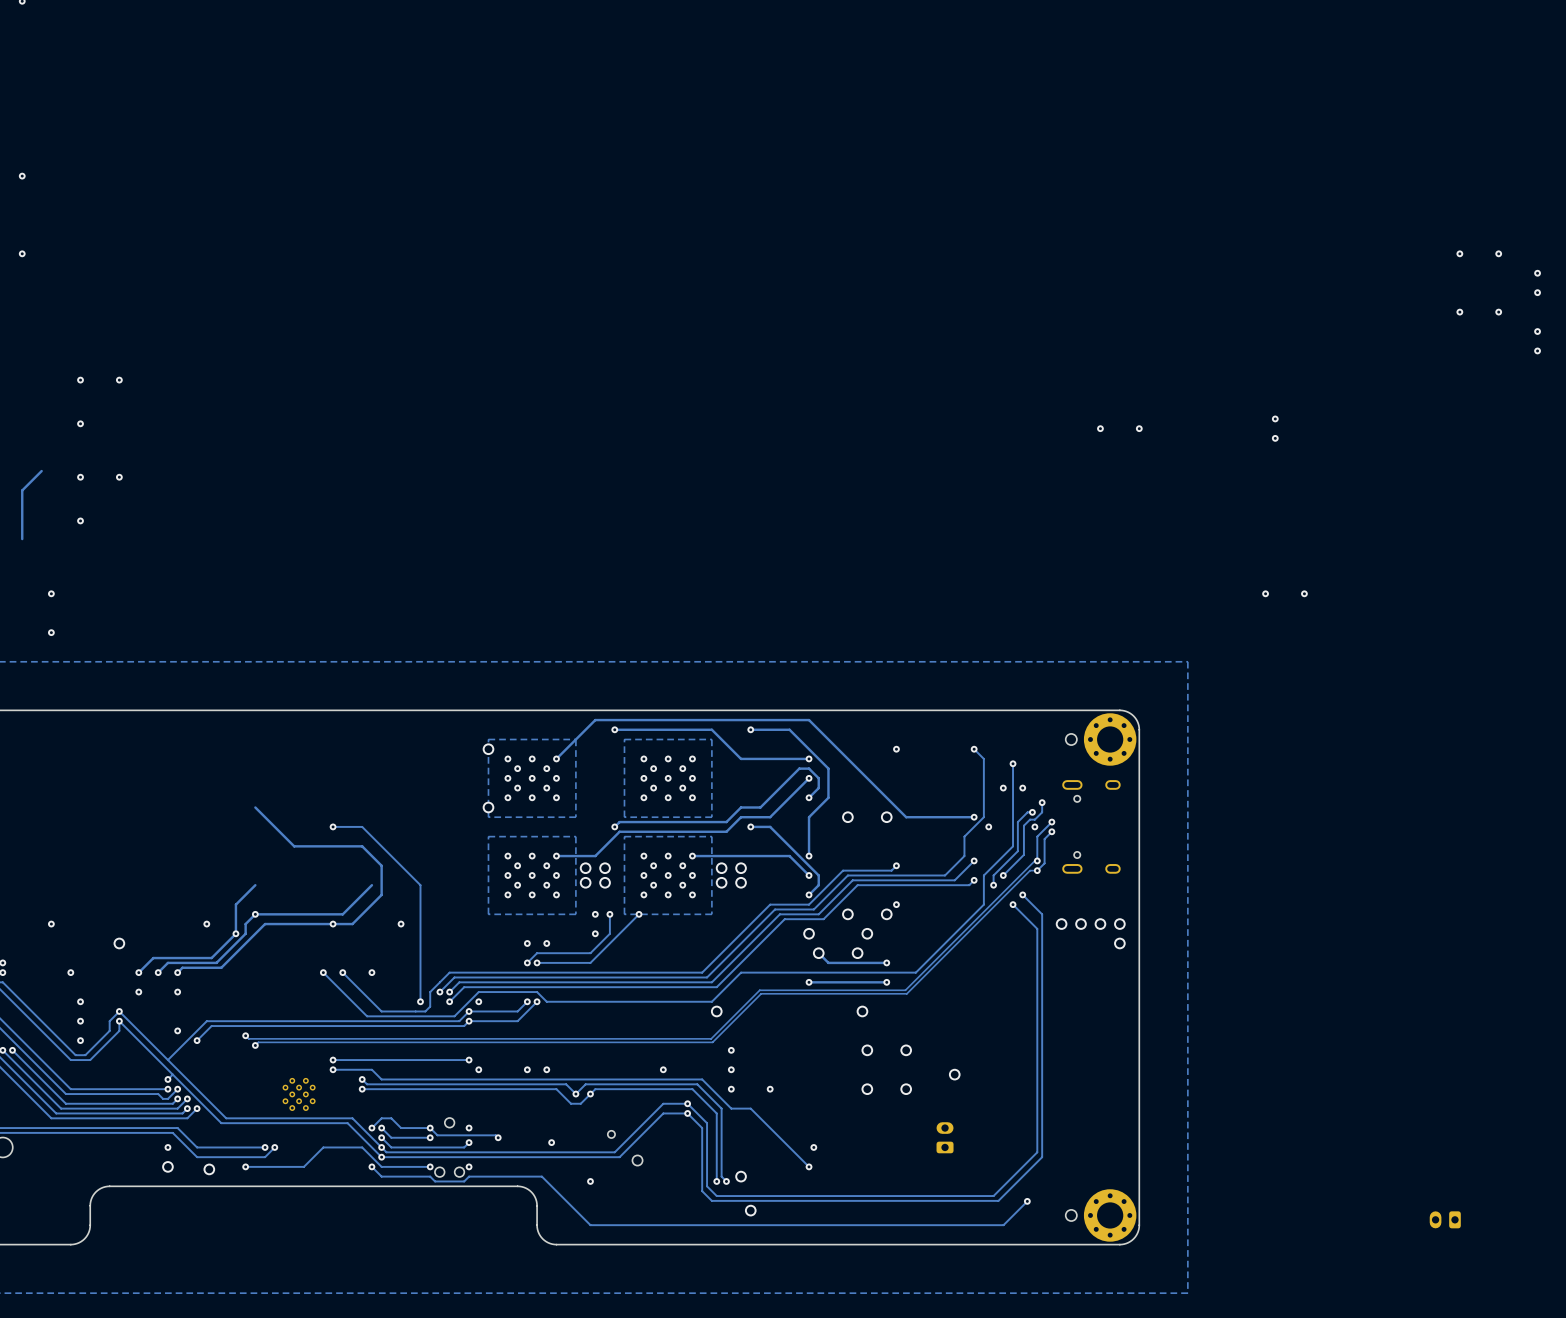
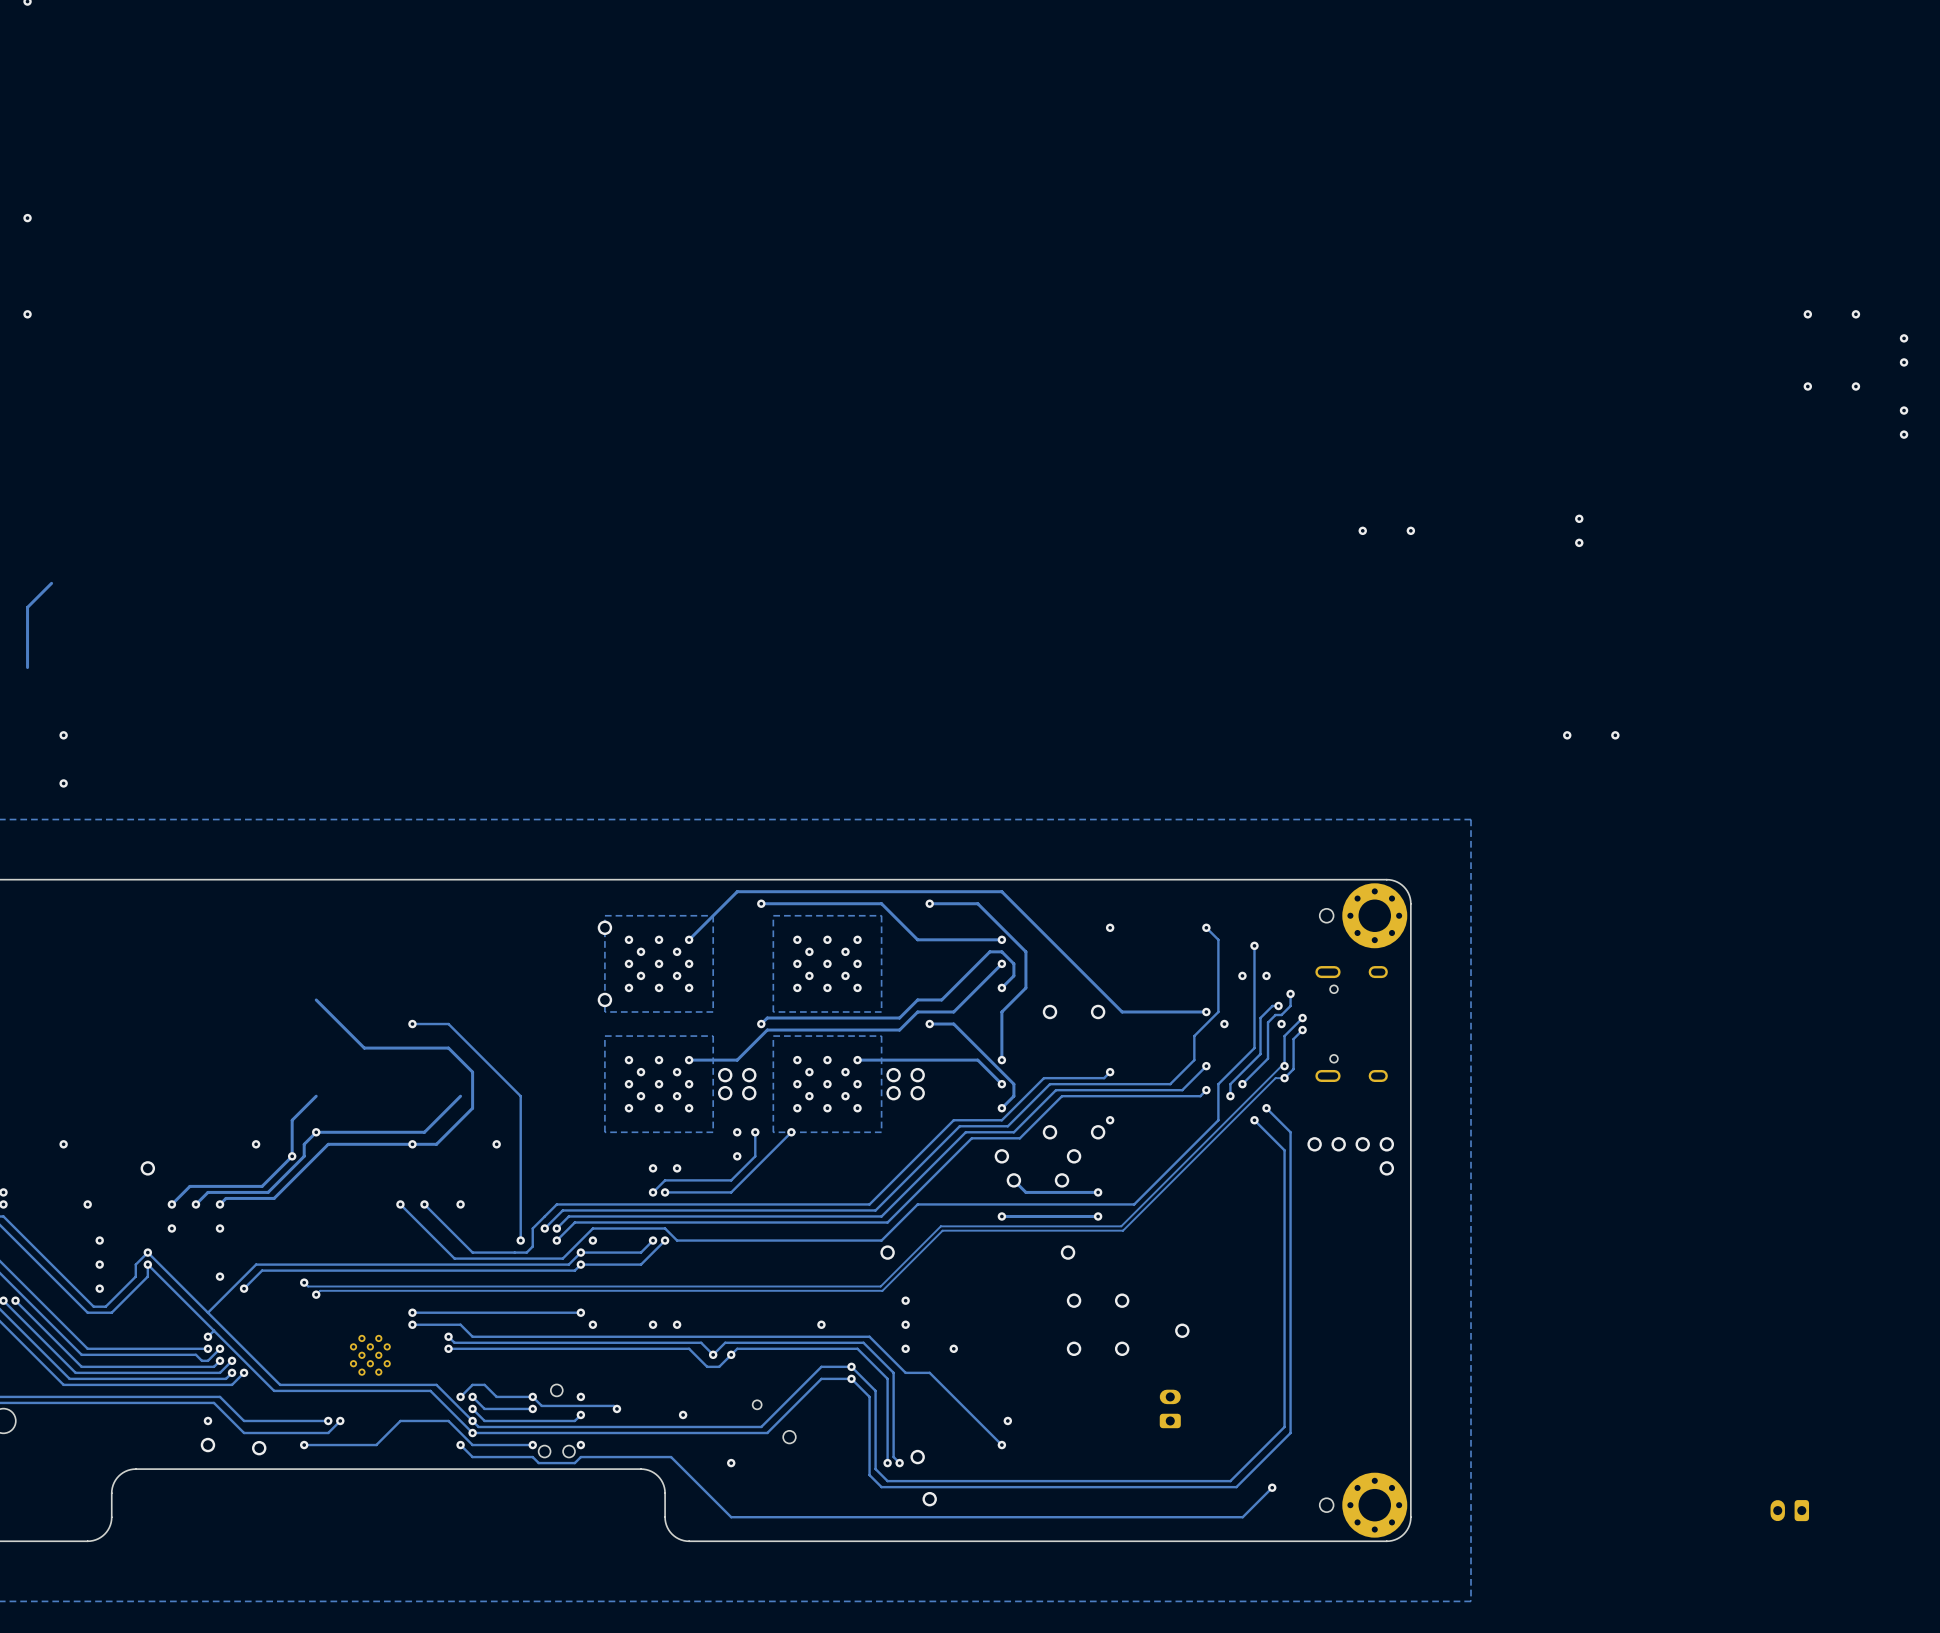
via: (80, 380) -> none
via: (119, 380) -> none
via: (80, 423) -> none
via: (80, 477) -> none
via: (119, 477) -> none
via: (80, 520) -> none

